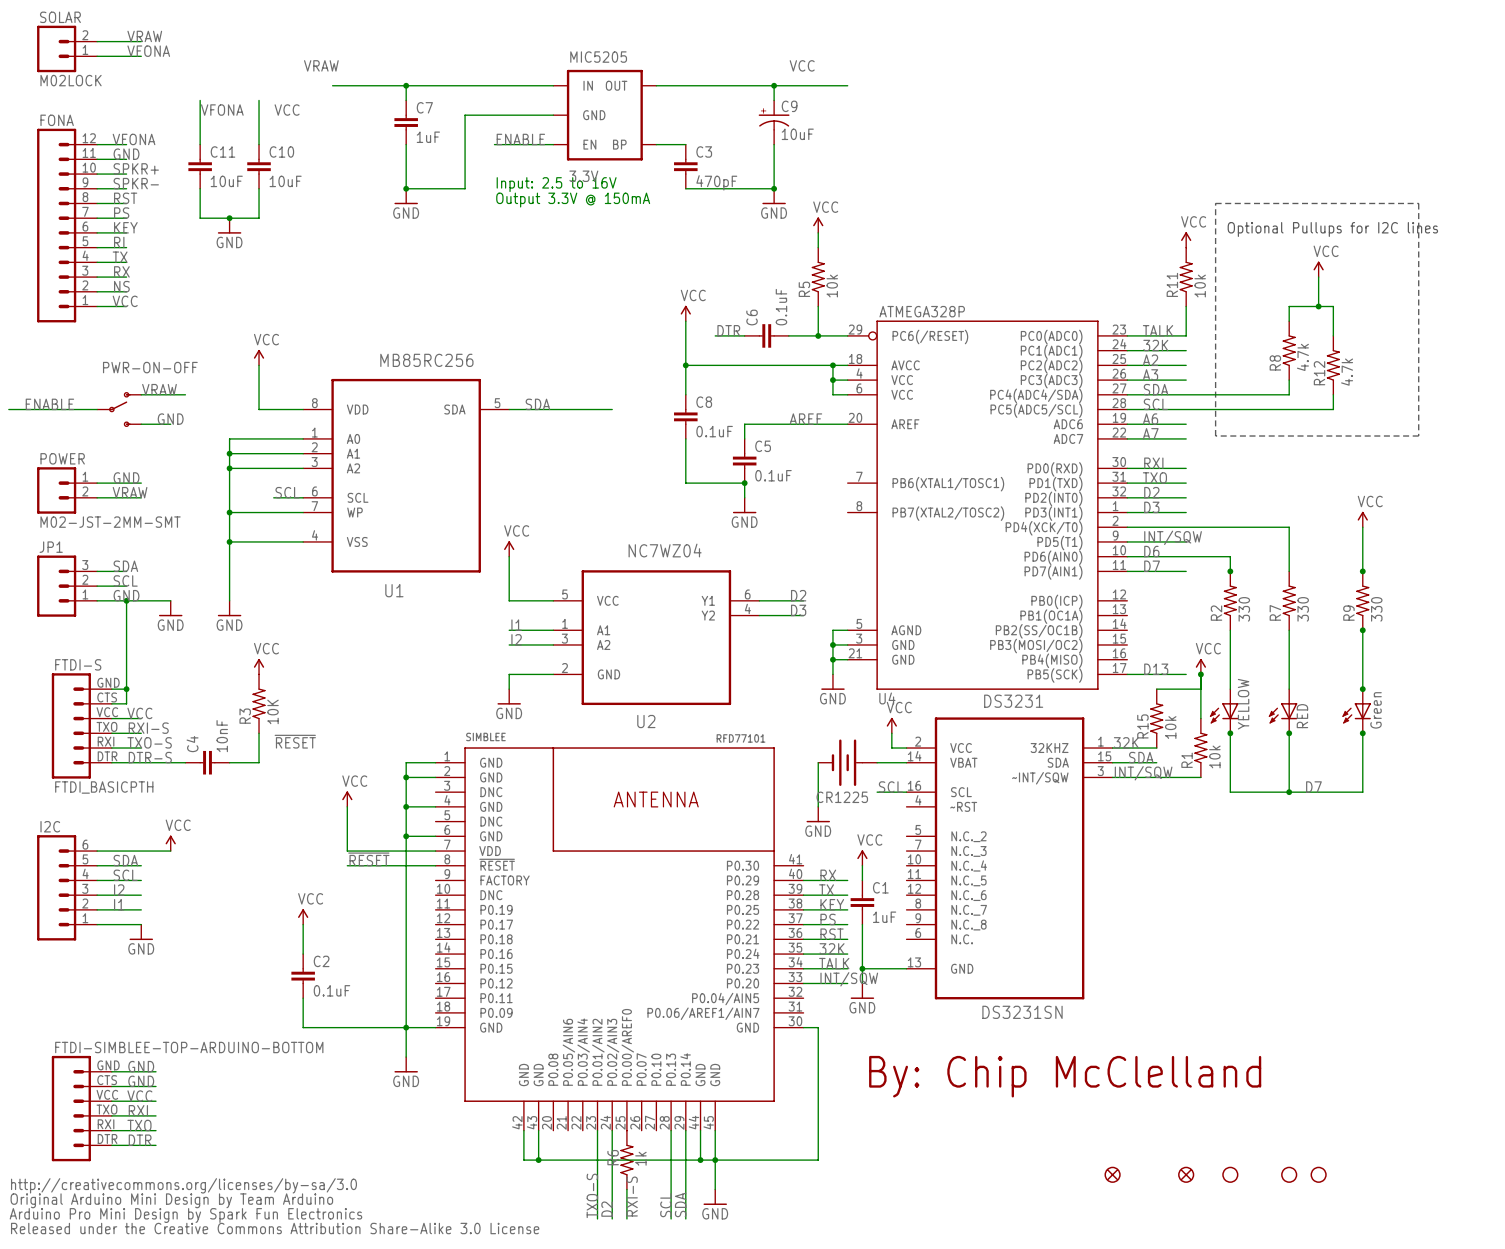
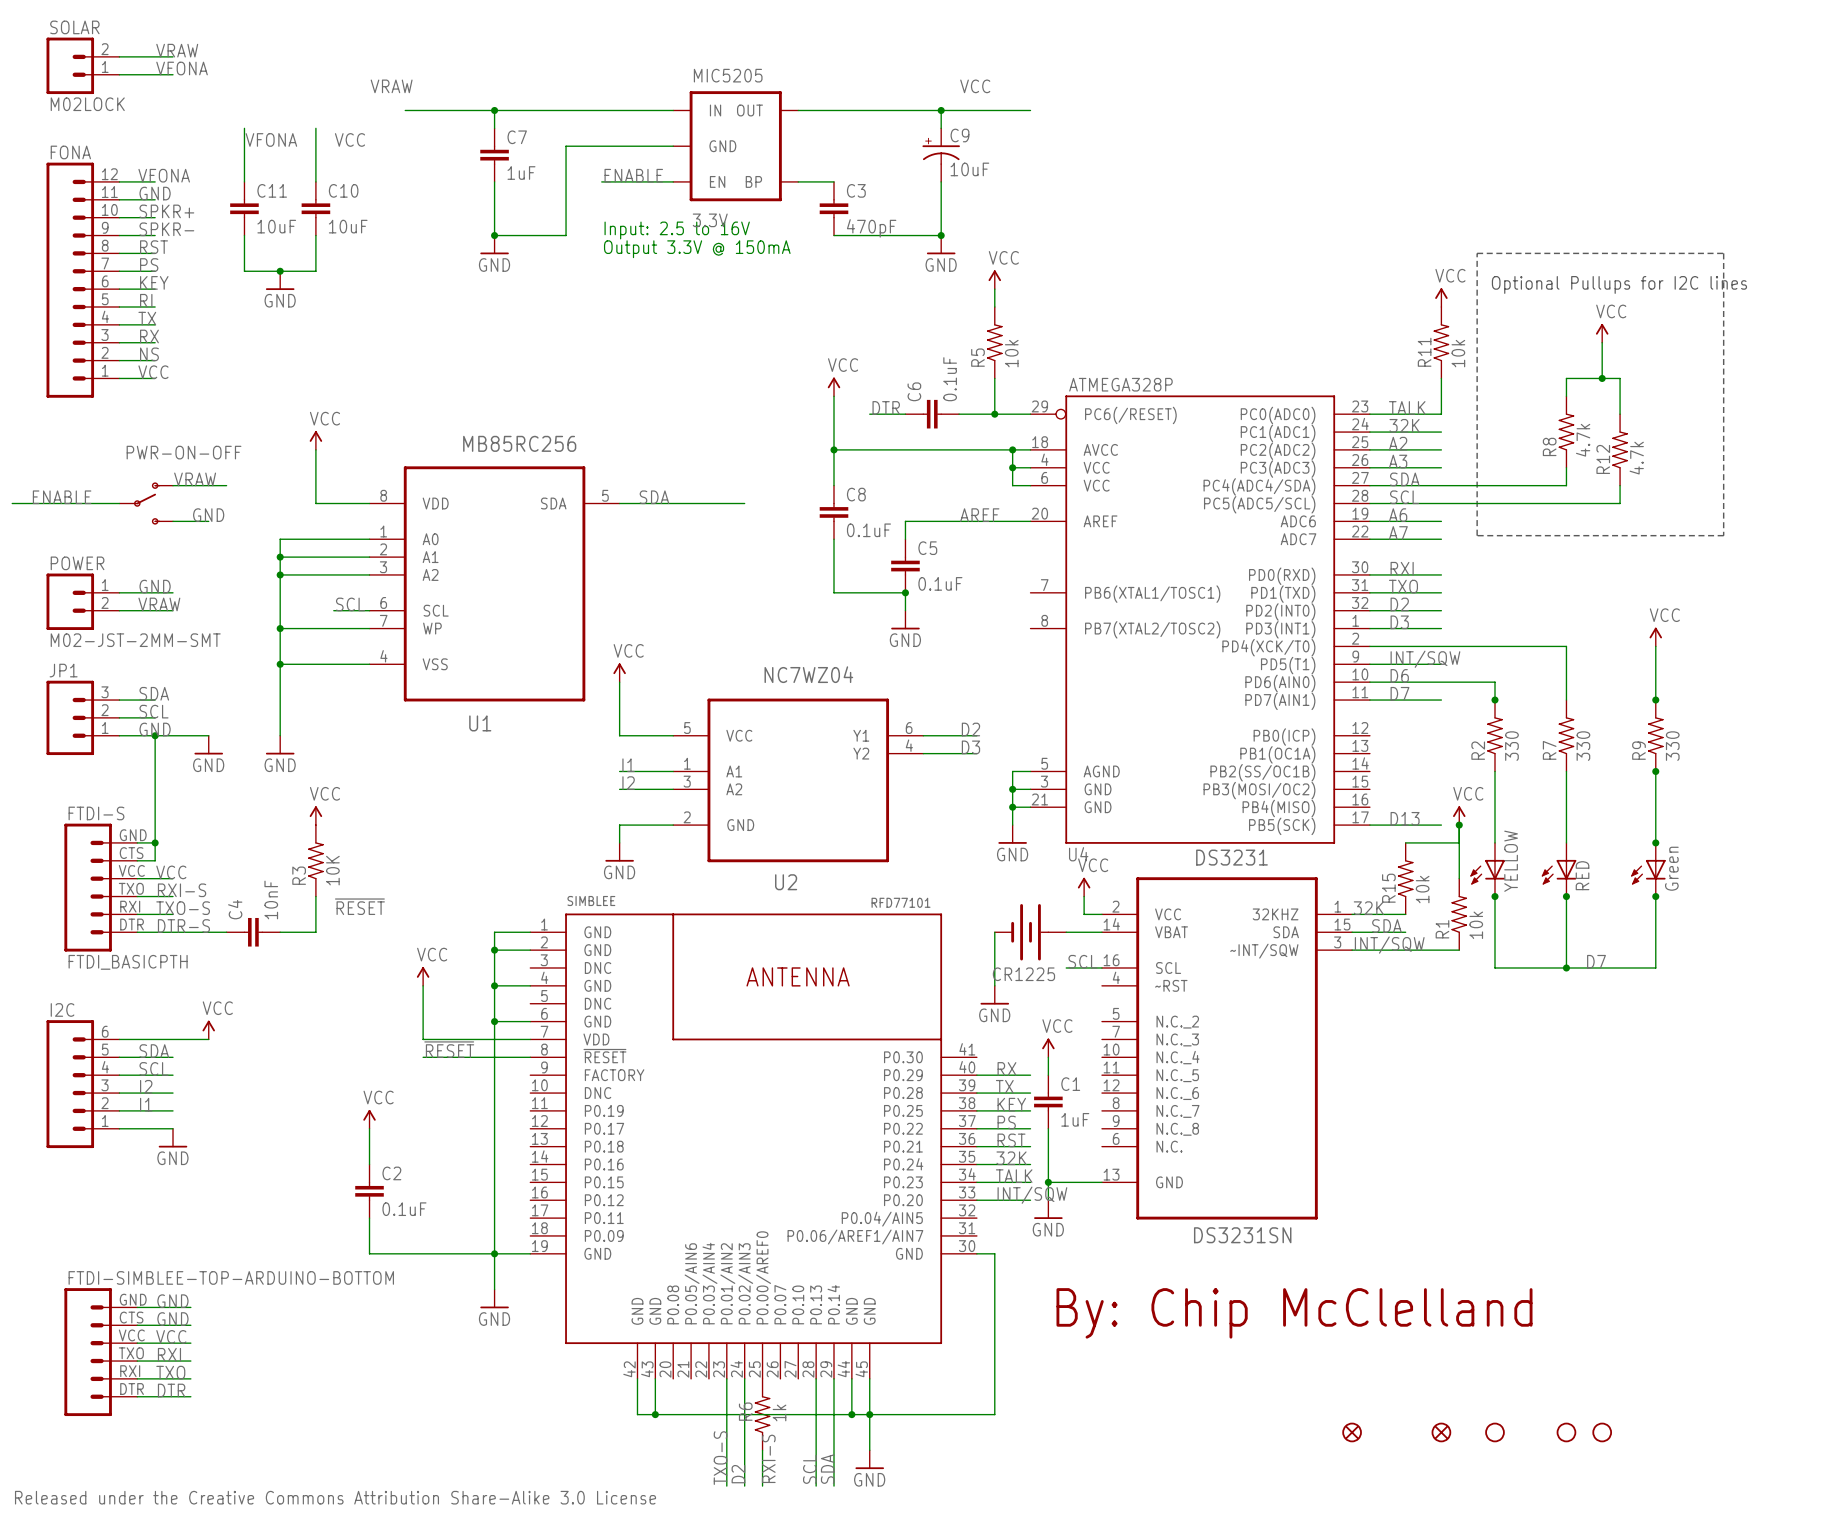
text: http://creativecommons.org/licenses/by-sa/3.0 (183, 1185) -> none
text: Original Arduino Mini Design by Team Arduino (171, 1200) -> none
text: Arduino Pro Mini Design by Spark Fun Electronics (185, 1215) -> none

